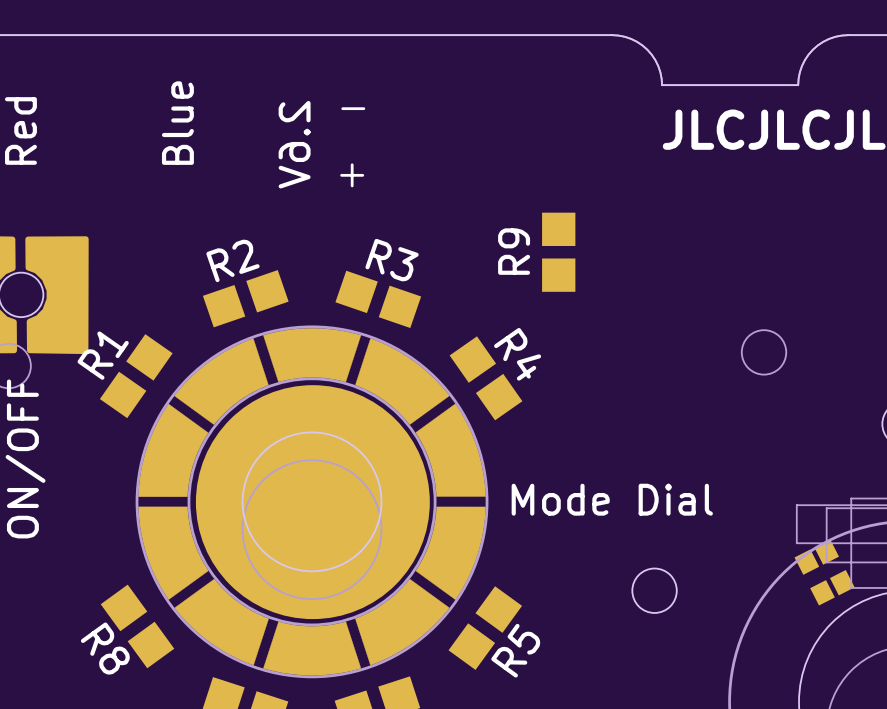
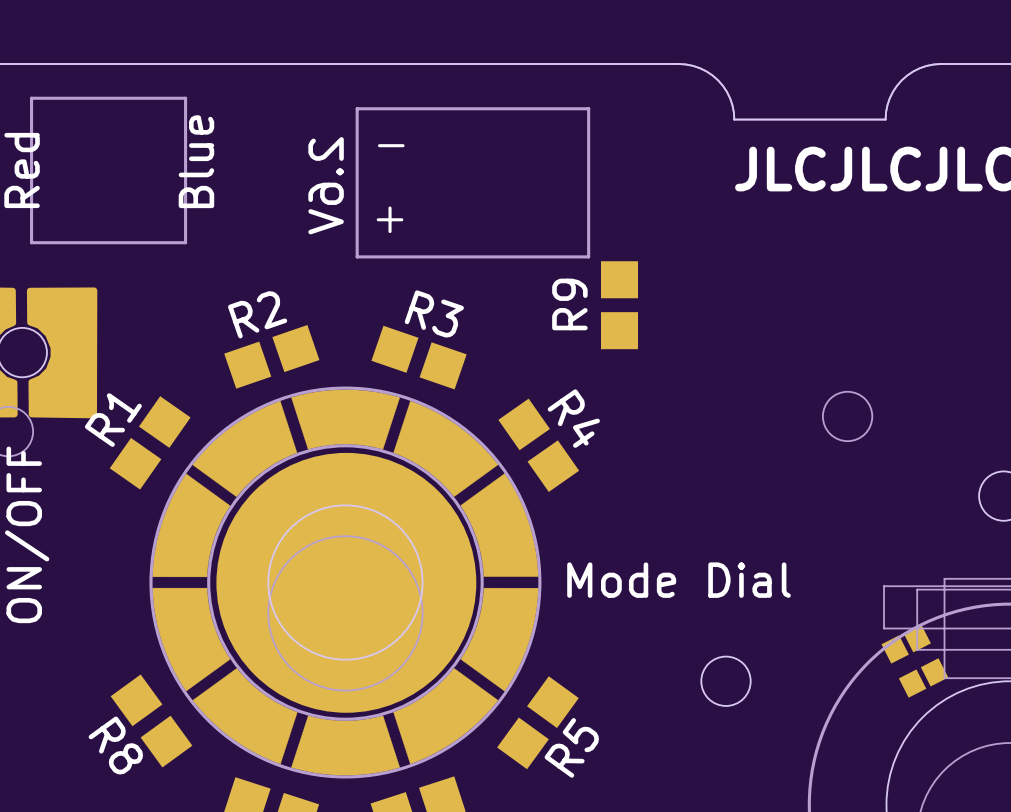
line: none -> (31, 98) (185, 98) (185, 242) (31, 242) (31, 98)
line: none -> (357, 108) (588, 108) (588, 256) (357, 256) (357, 108)

